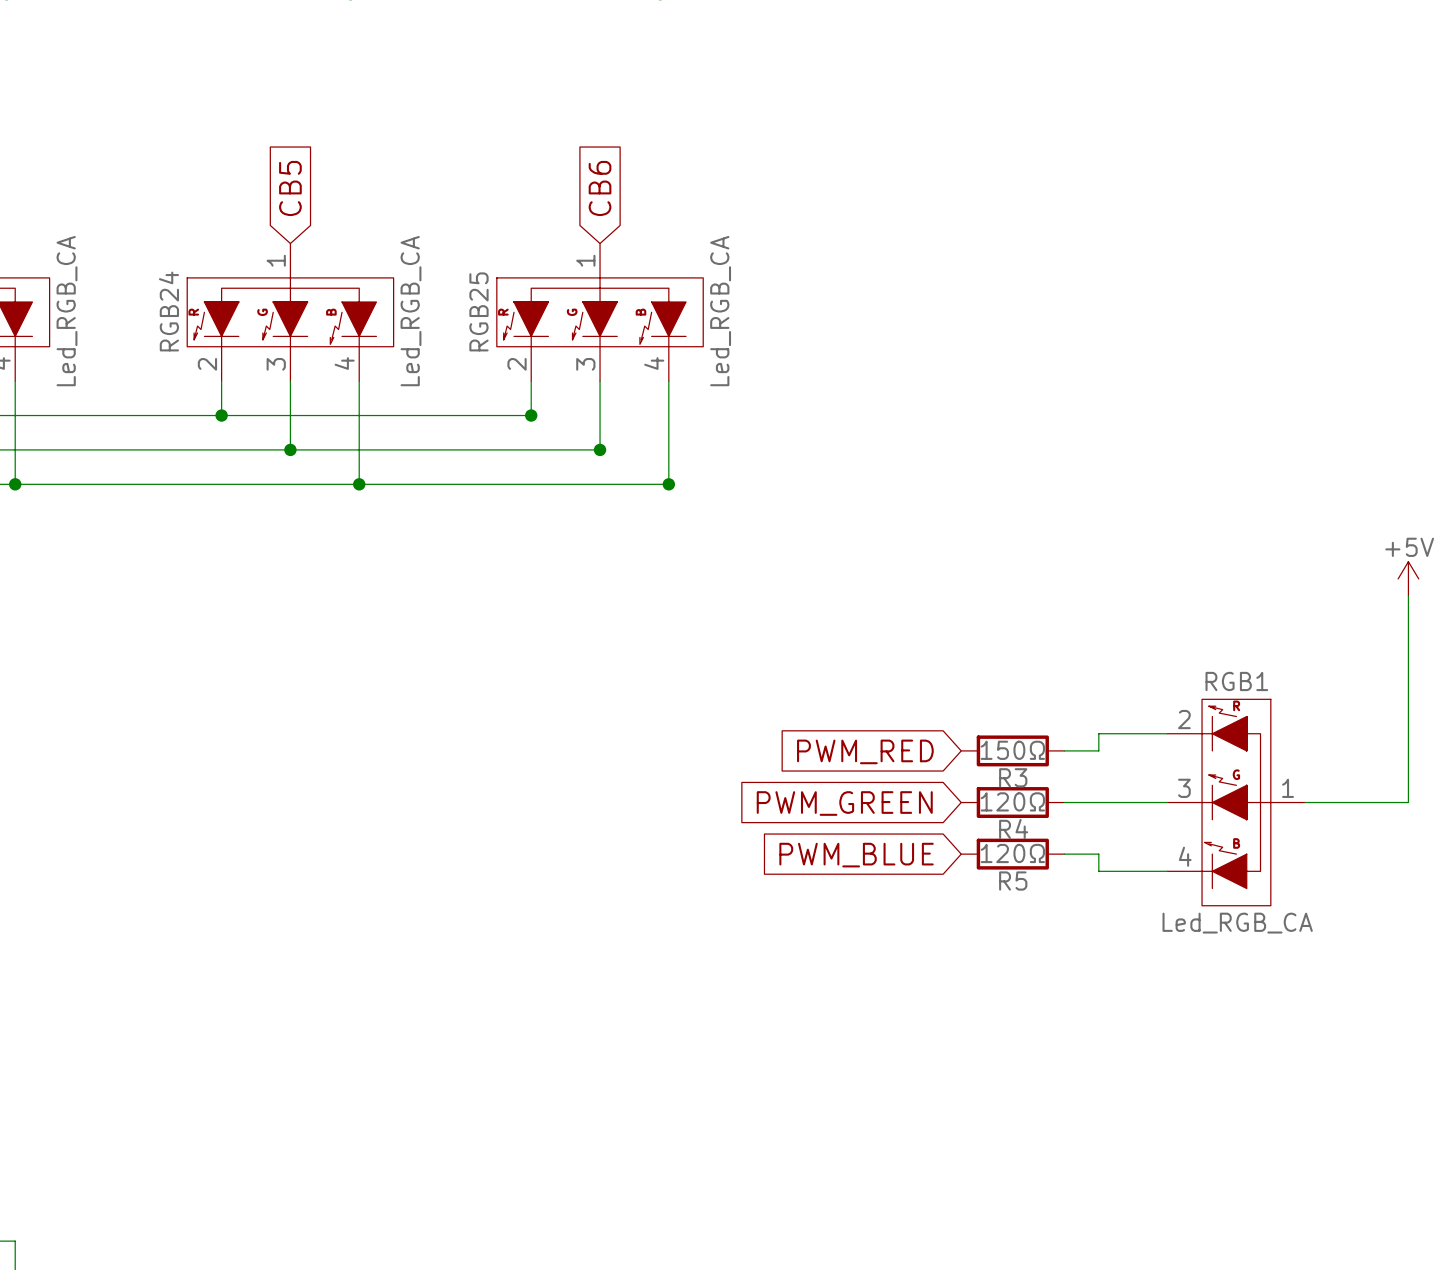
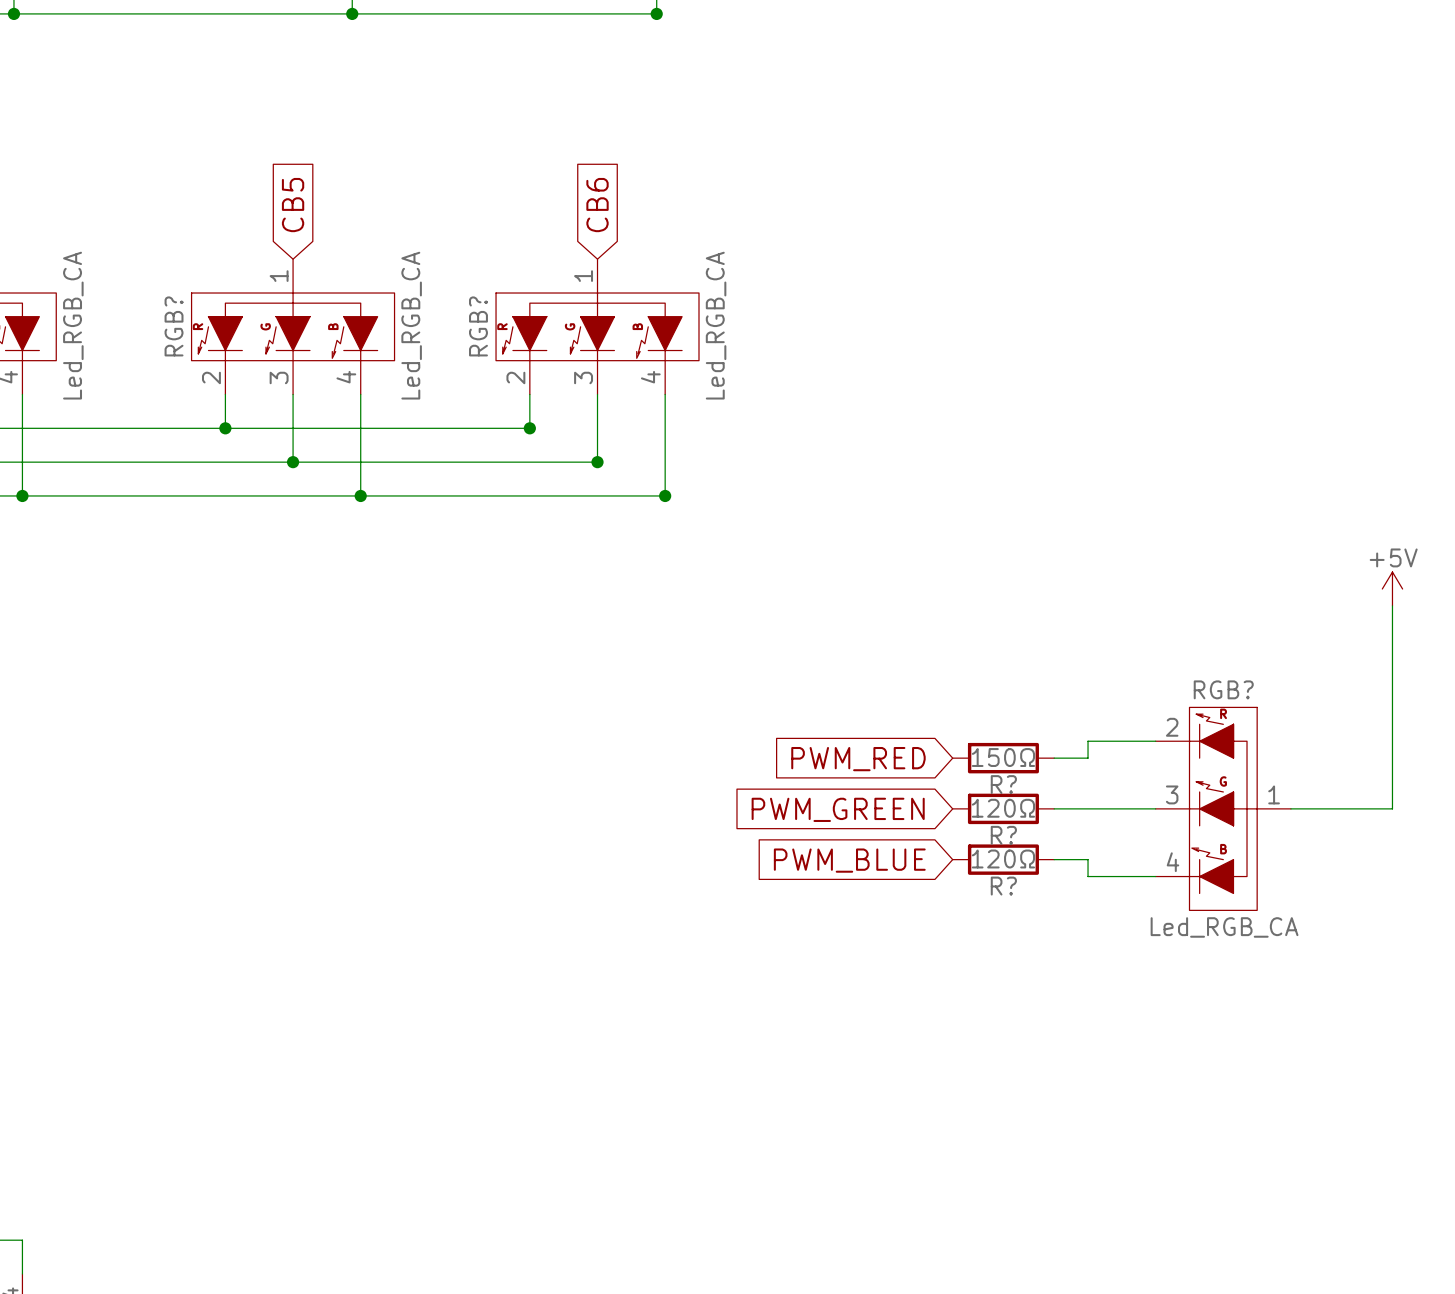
RGB24 name: RGB24 (168, 311) -> RGB? (174, 326)
RGB25 name: RGB25 (478, 311) -> RGB? (478, 326)
RGB1 name: RGB1 (1236, 681) -> RGB? (1223, 689)
R3 name: R3 (1013, 777) -> R? (1003, 784)
R4 name: R4 (1013, 828) -> R? (1003, 835)
R5 name: R5 (1013, 881) -> R? (1003, 886)

